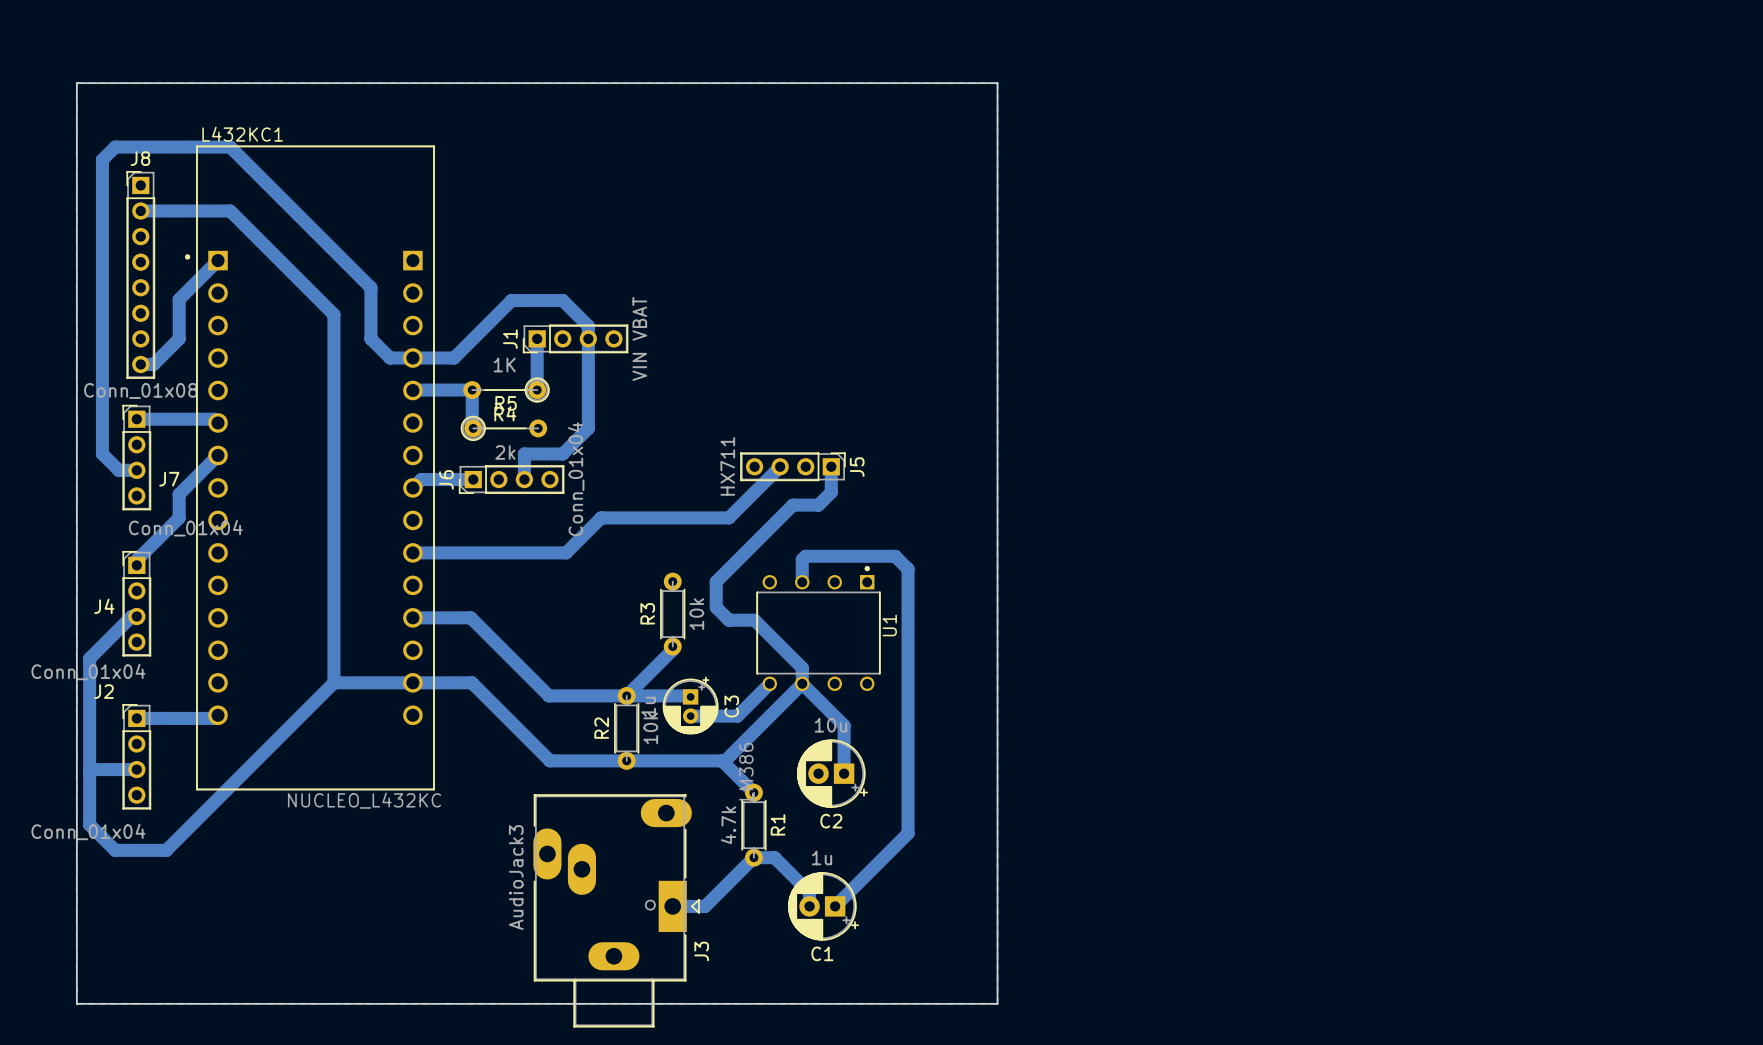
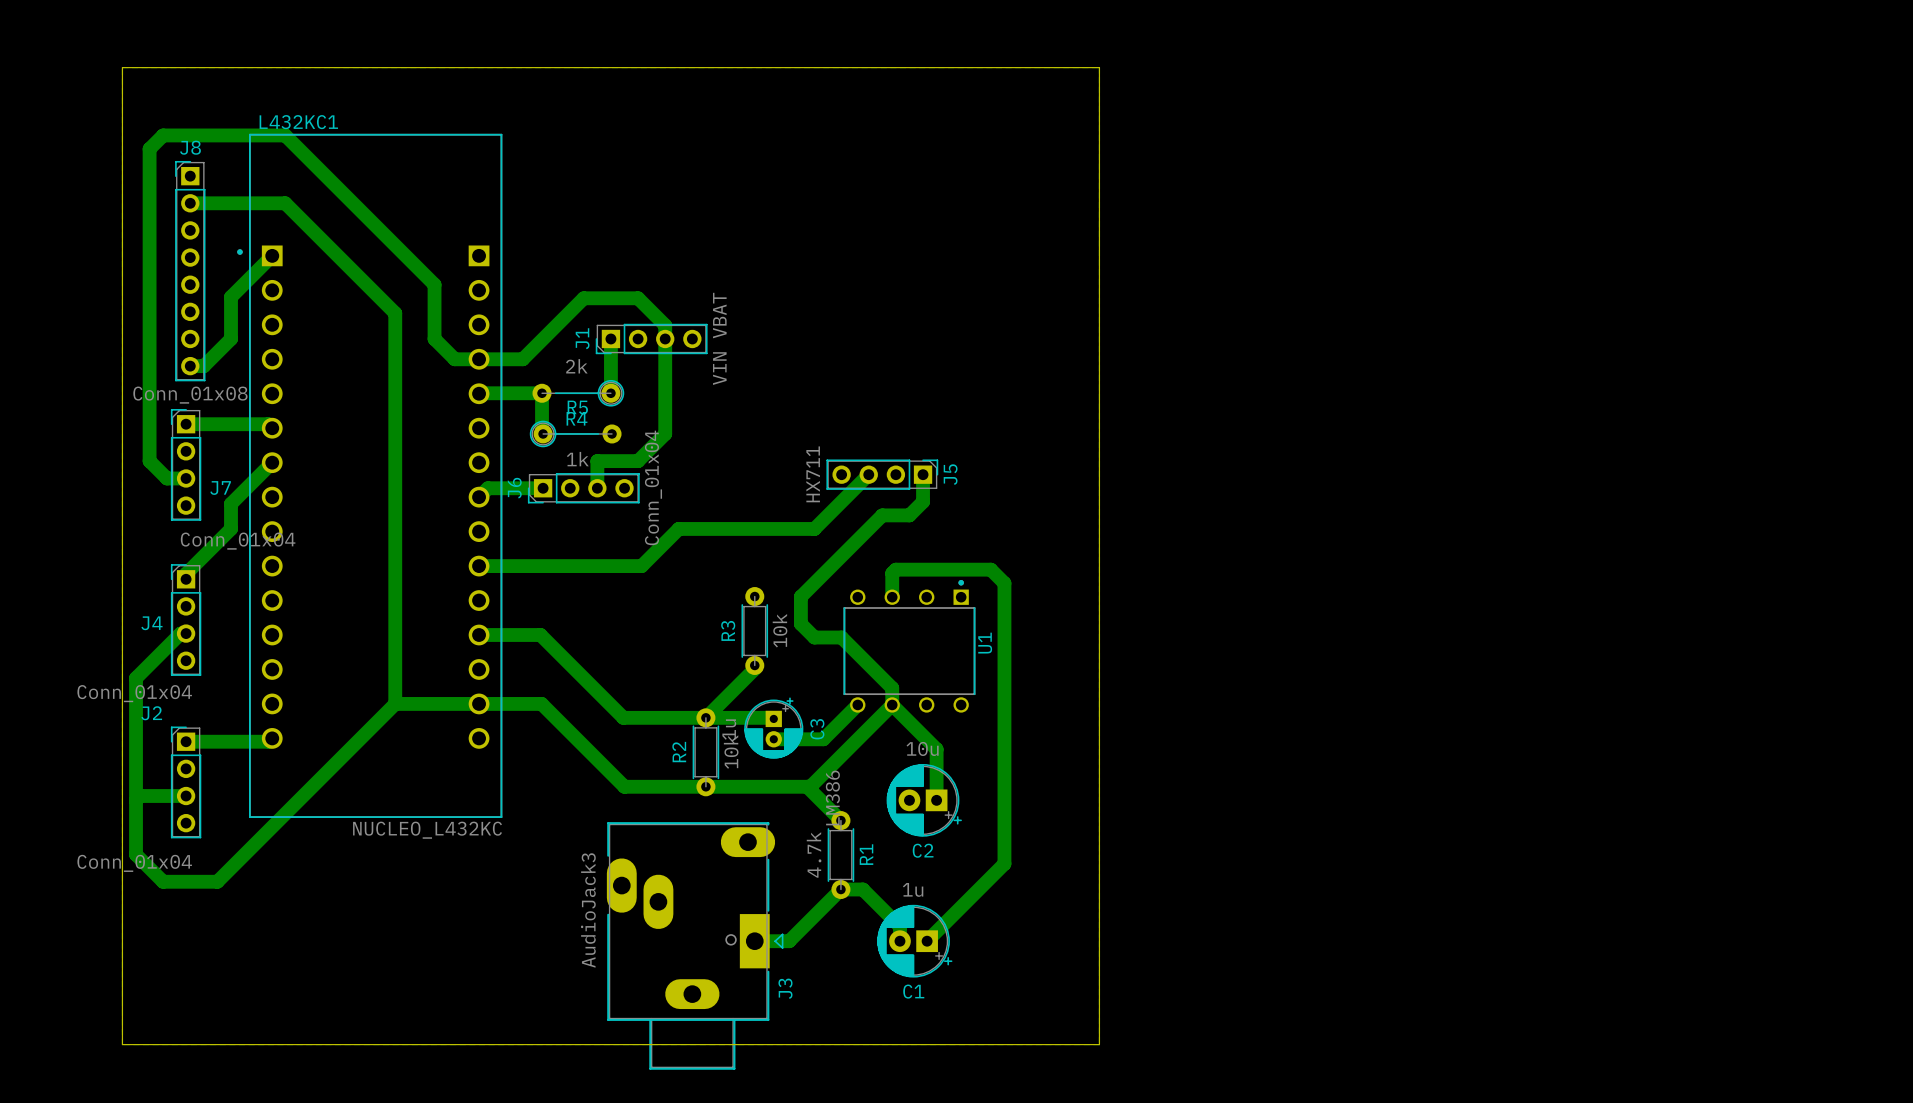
R4 value: 1K (504, 365) -> 2k (576, 366)
R5 value: 2k (505, 452) -> 1k (577, 459)

